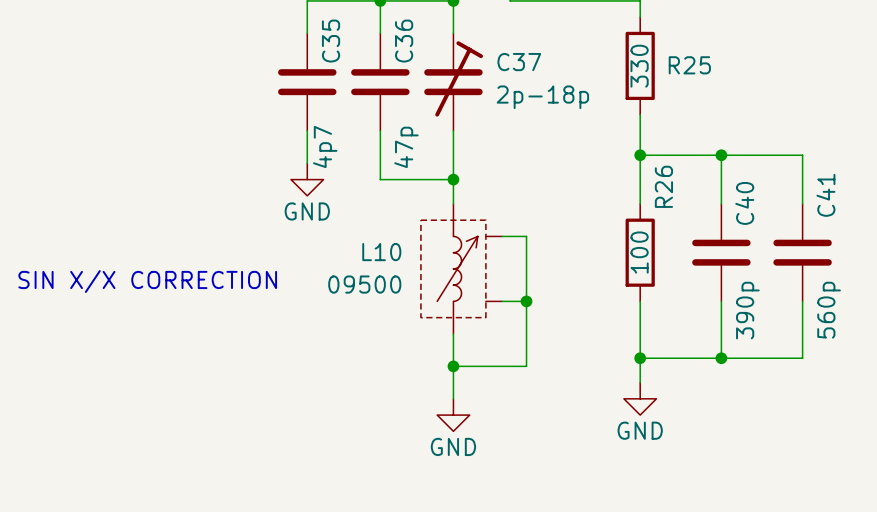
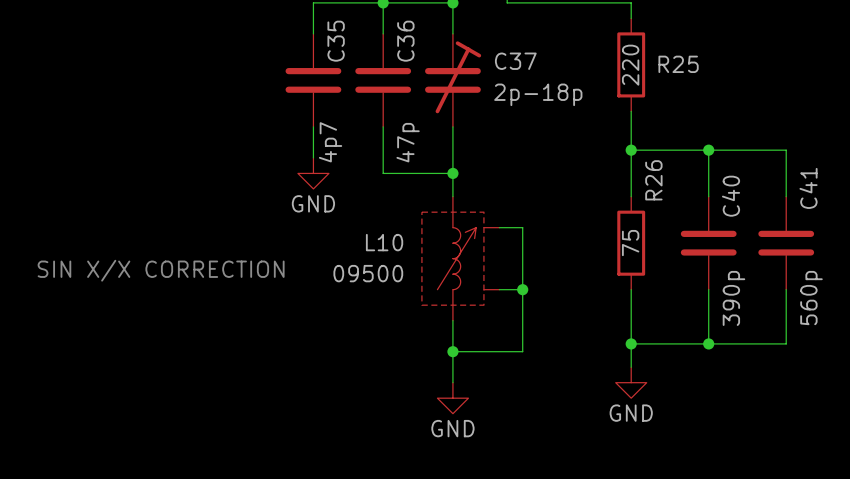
R25 value: 330 (639, 66) -> 220 (630, 65)
R26 value: 100 (639, 252) -> 75 (630, 243)

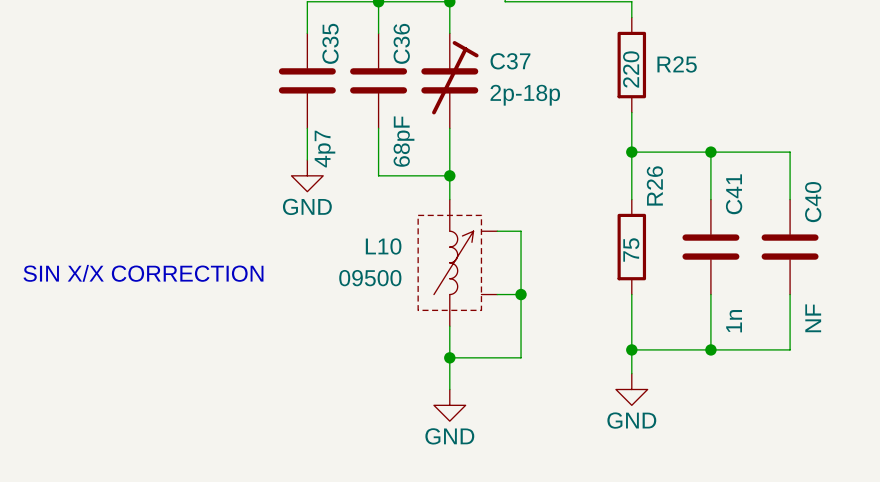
C36 value: 47p (408, 142) -> 68pF (403, 141)
C41 name: C41 (808, 188) -> C40 (813, 202)
C40 name: C40 (731, 196) -> C41 (734, 194)
C40 value: 390p (733, 298) -> 1n (734, 321)
C41 value: 560p (811, 298) -> NF (813, 318)

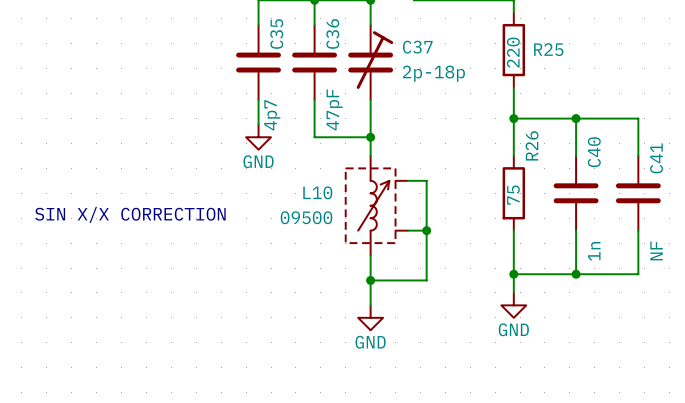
C36 value: 68pF (403, 141) -> 47pF (334, 109)
C41 name: C41 (734, 194) -> C40 (594, 152)
C40 name: C40 (813, 202) -> C41 (656, 158)

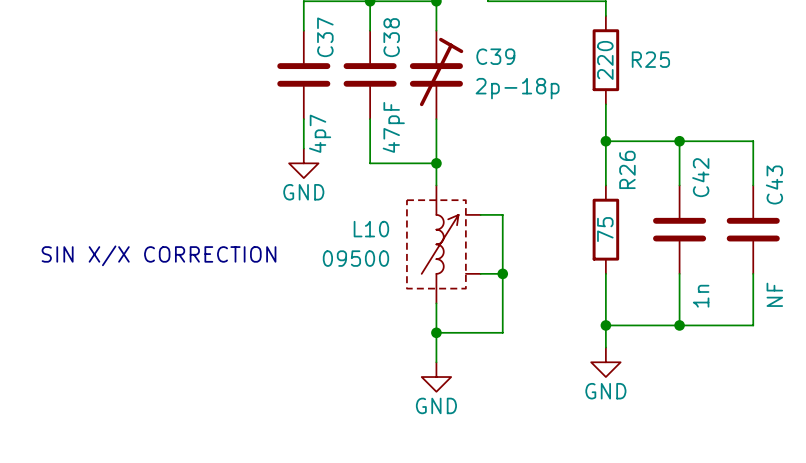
C36 name: C36 (332, 33) -> C38 (391, 37)
C35 name: C35 (276, 34) -> C37 (325, 37)
C37 name: C37 (417, 47) -> C39 (495, 56)
C40 name: C40 (594, 152) -> C42 (700, 177)
C41 name: C41 (656, 158) -> C43 (774, 184)

